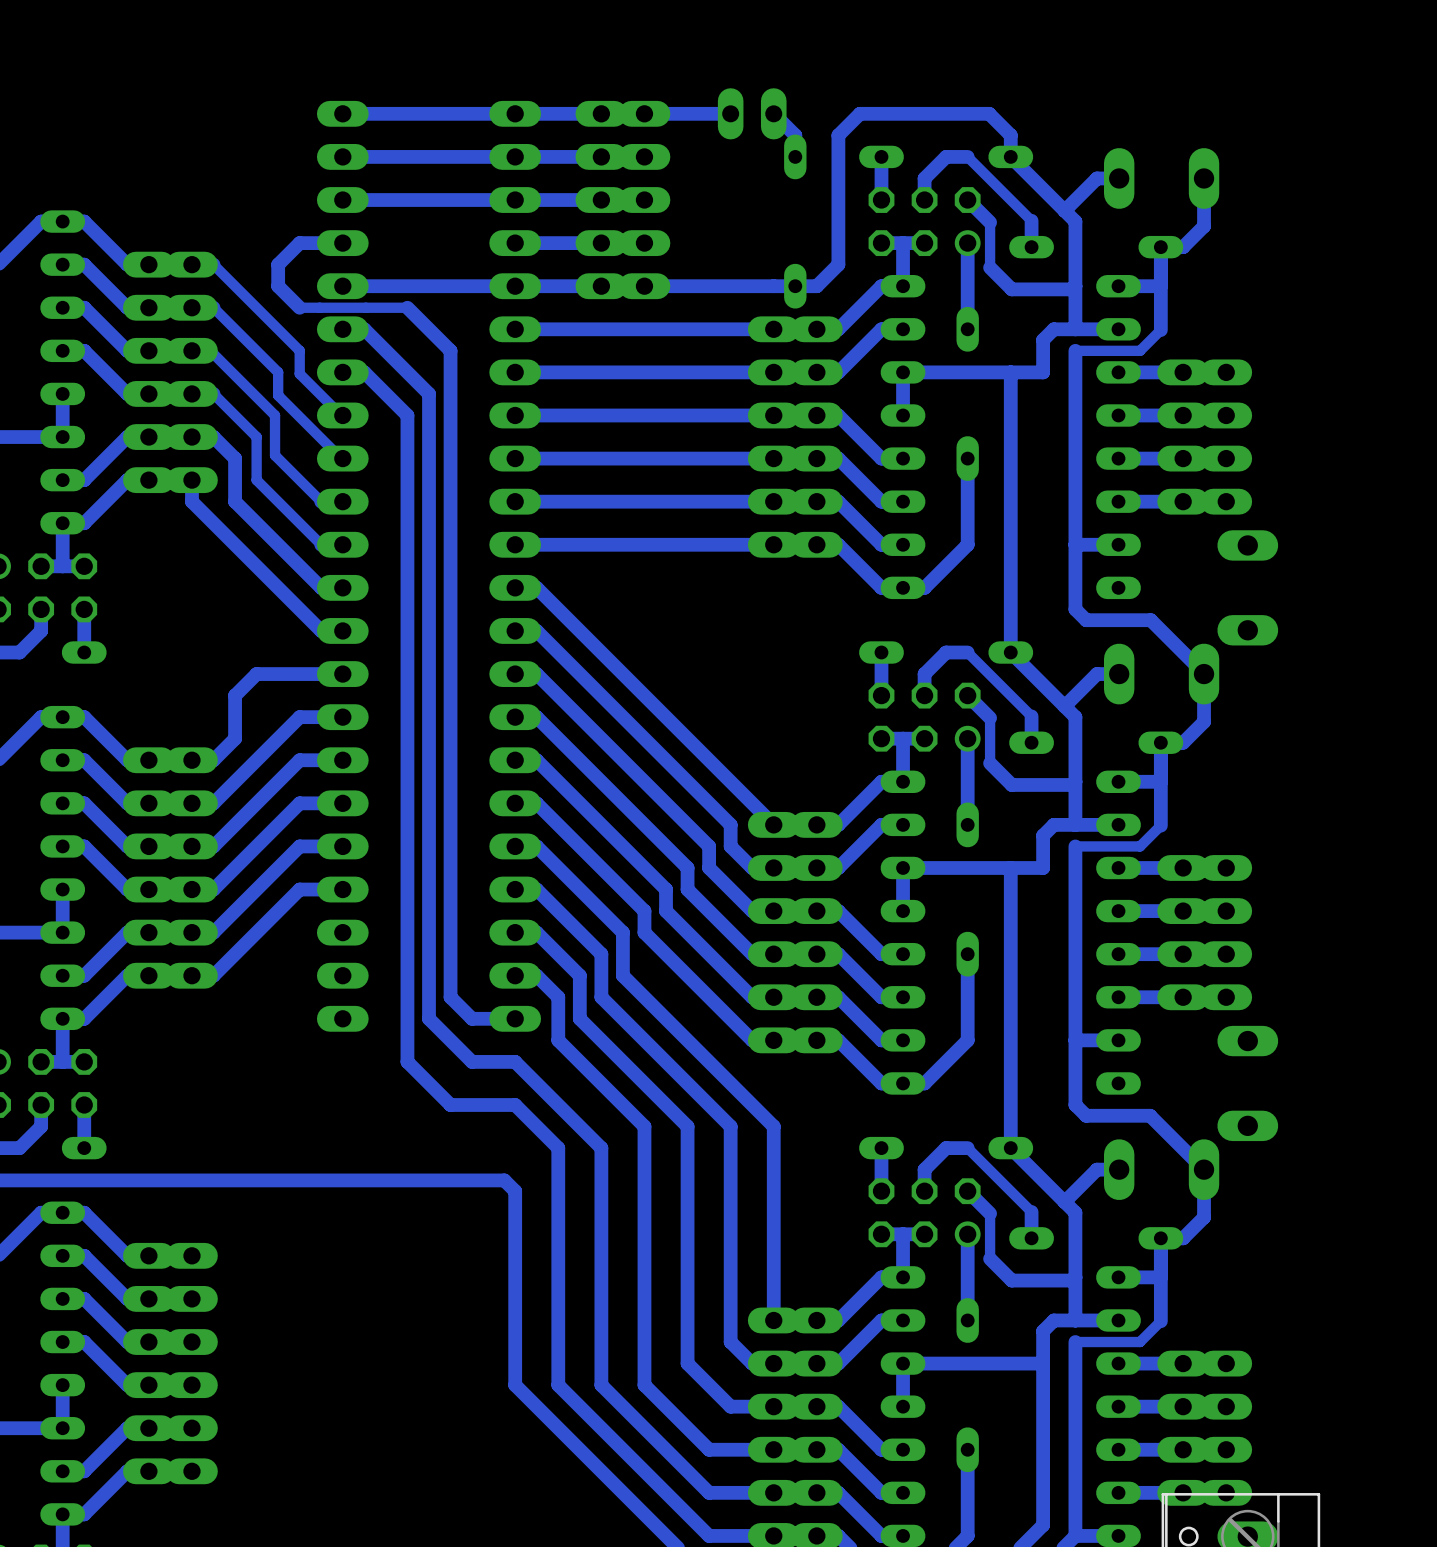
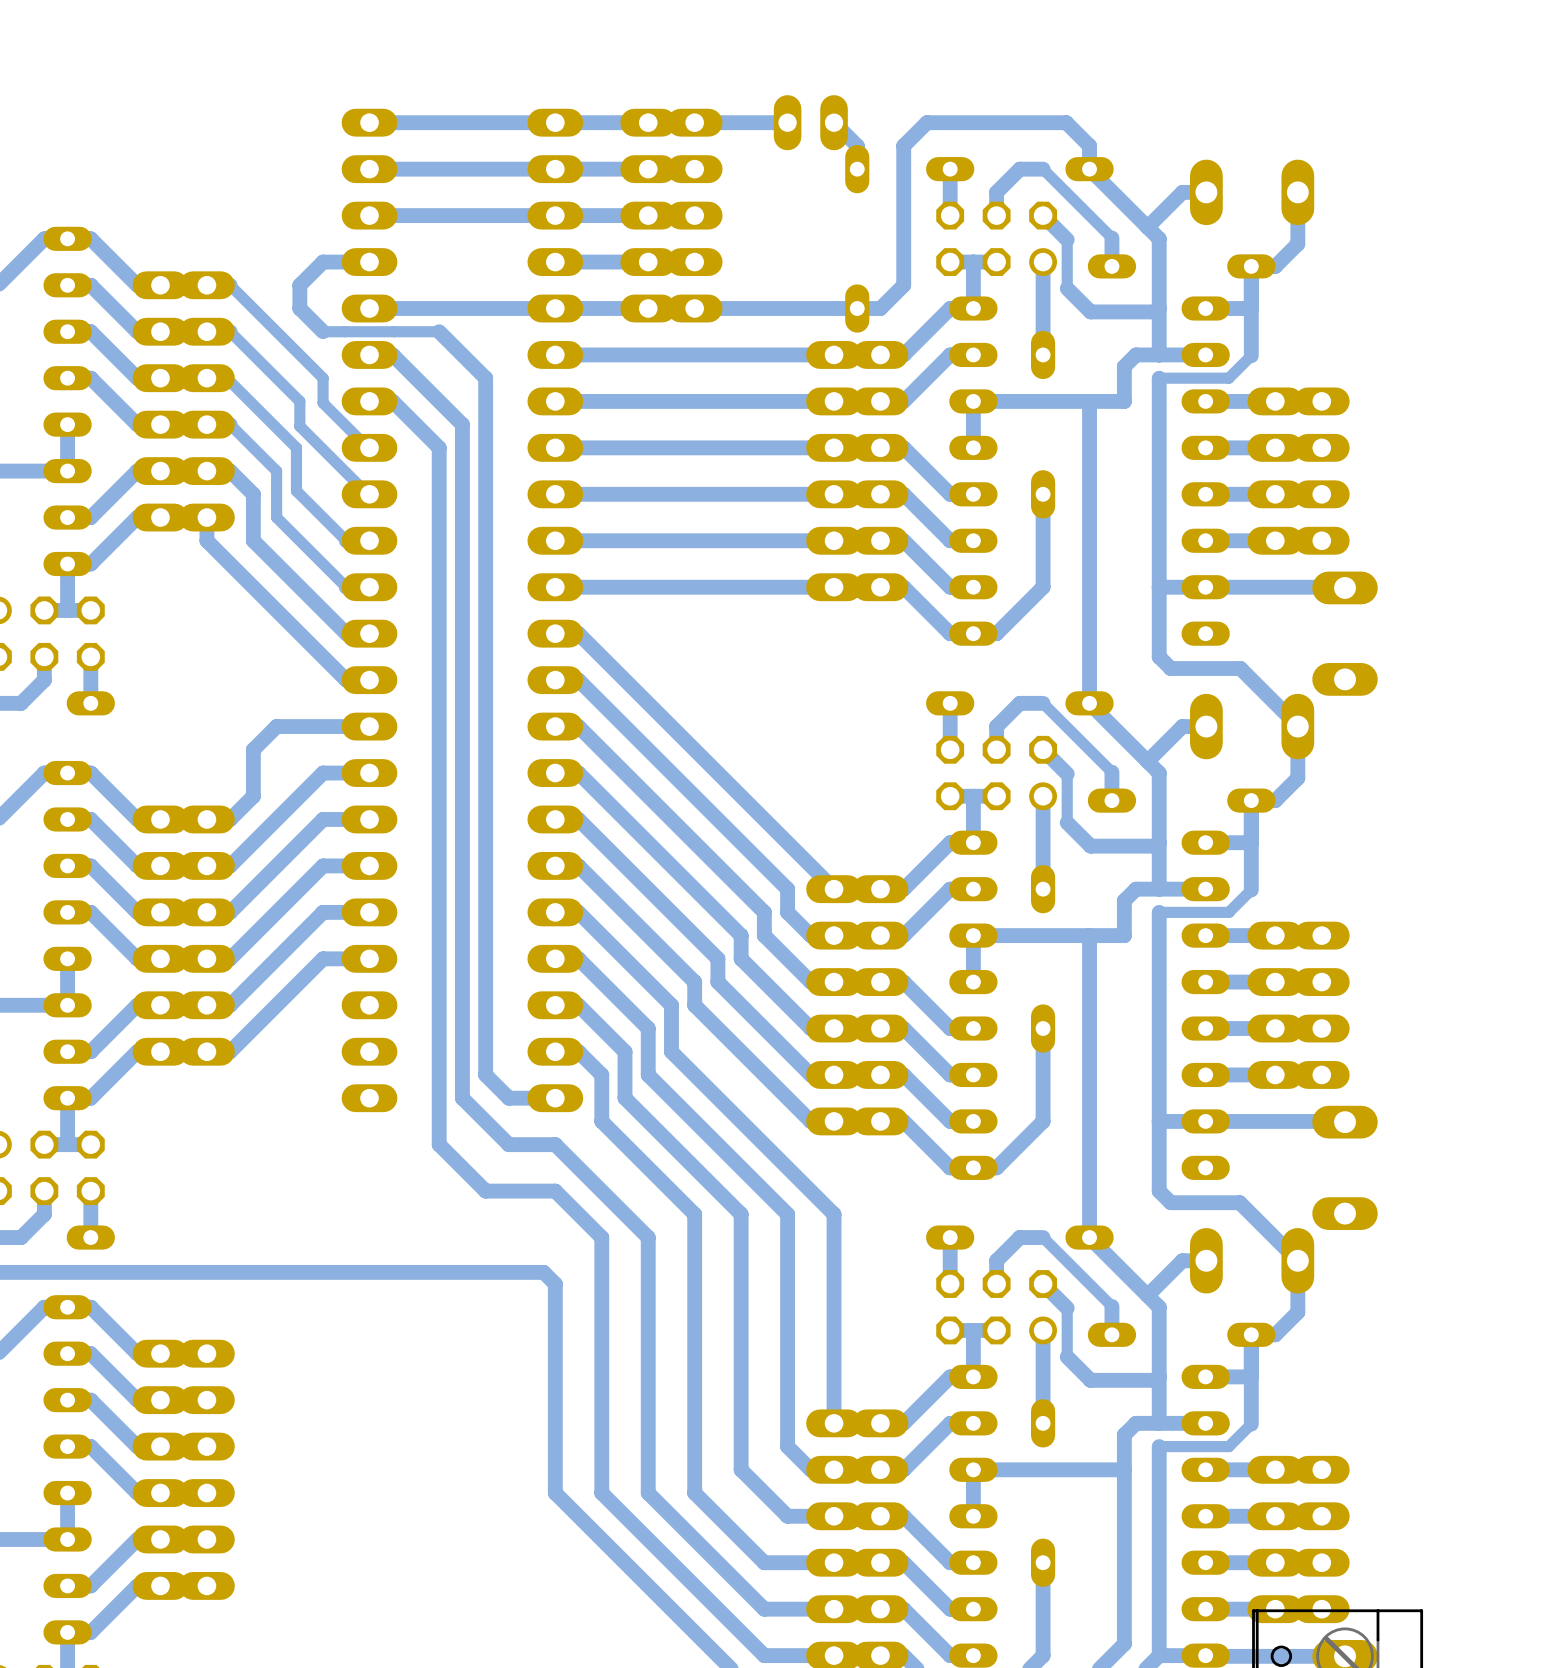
bottom track: none -> (1205, 587) (1345, 587)
bottom track: none -> (1205, 1121) (1345, 1122)
bottom track: none -> (1205, 1655) (1345, 1656)

